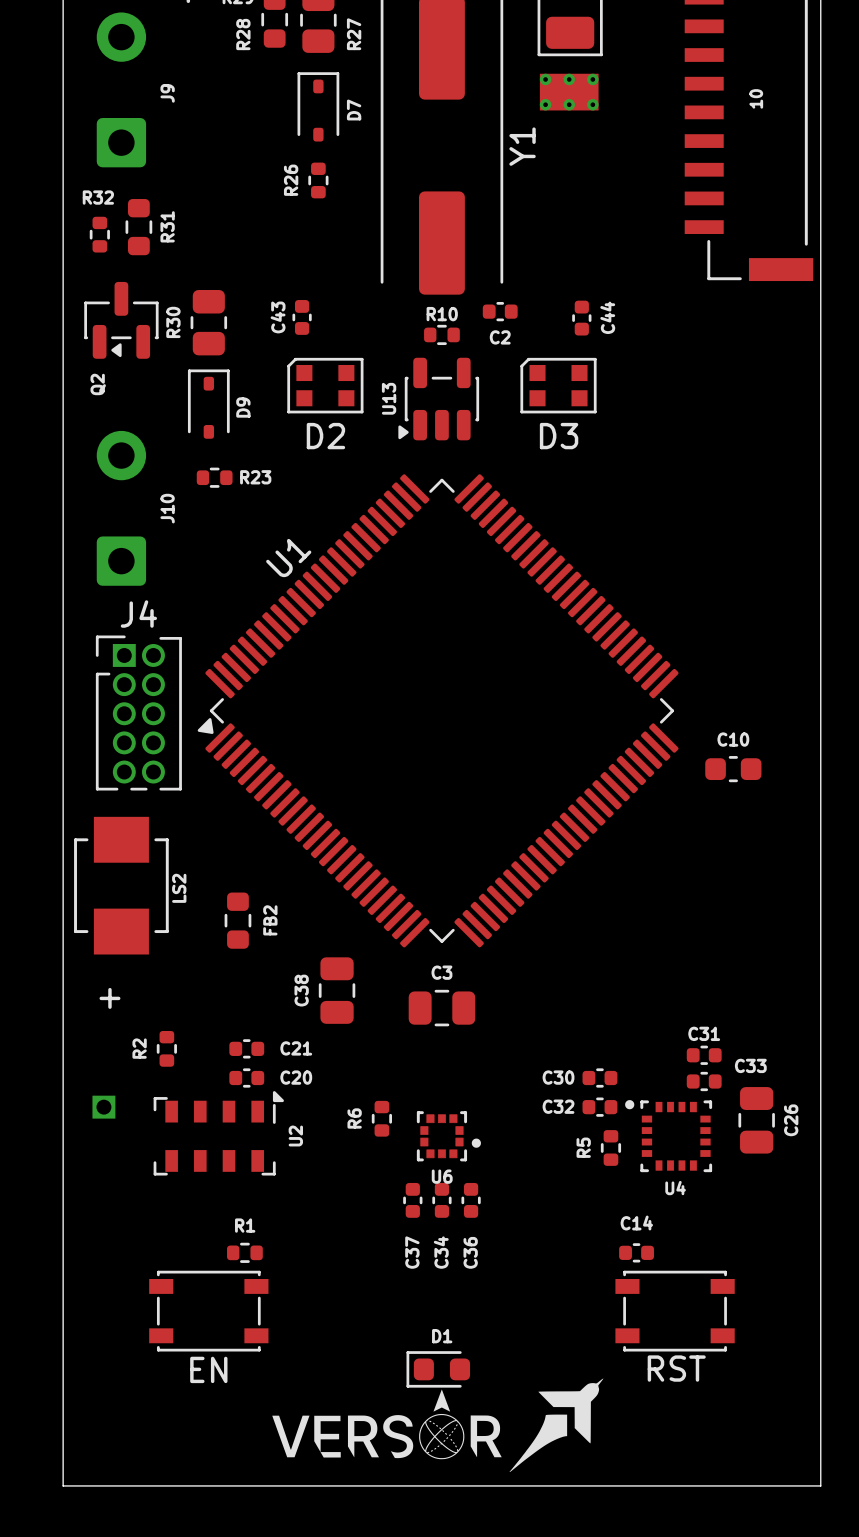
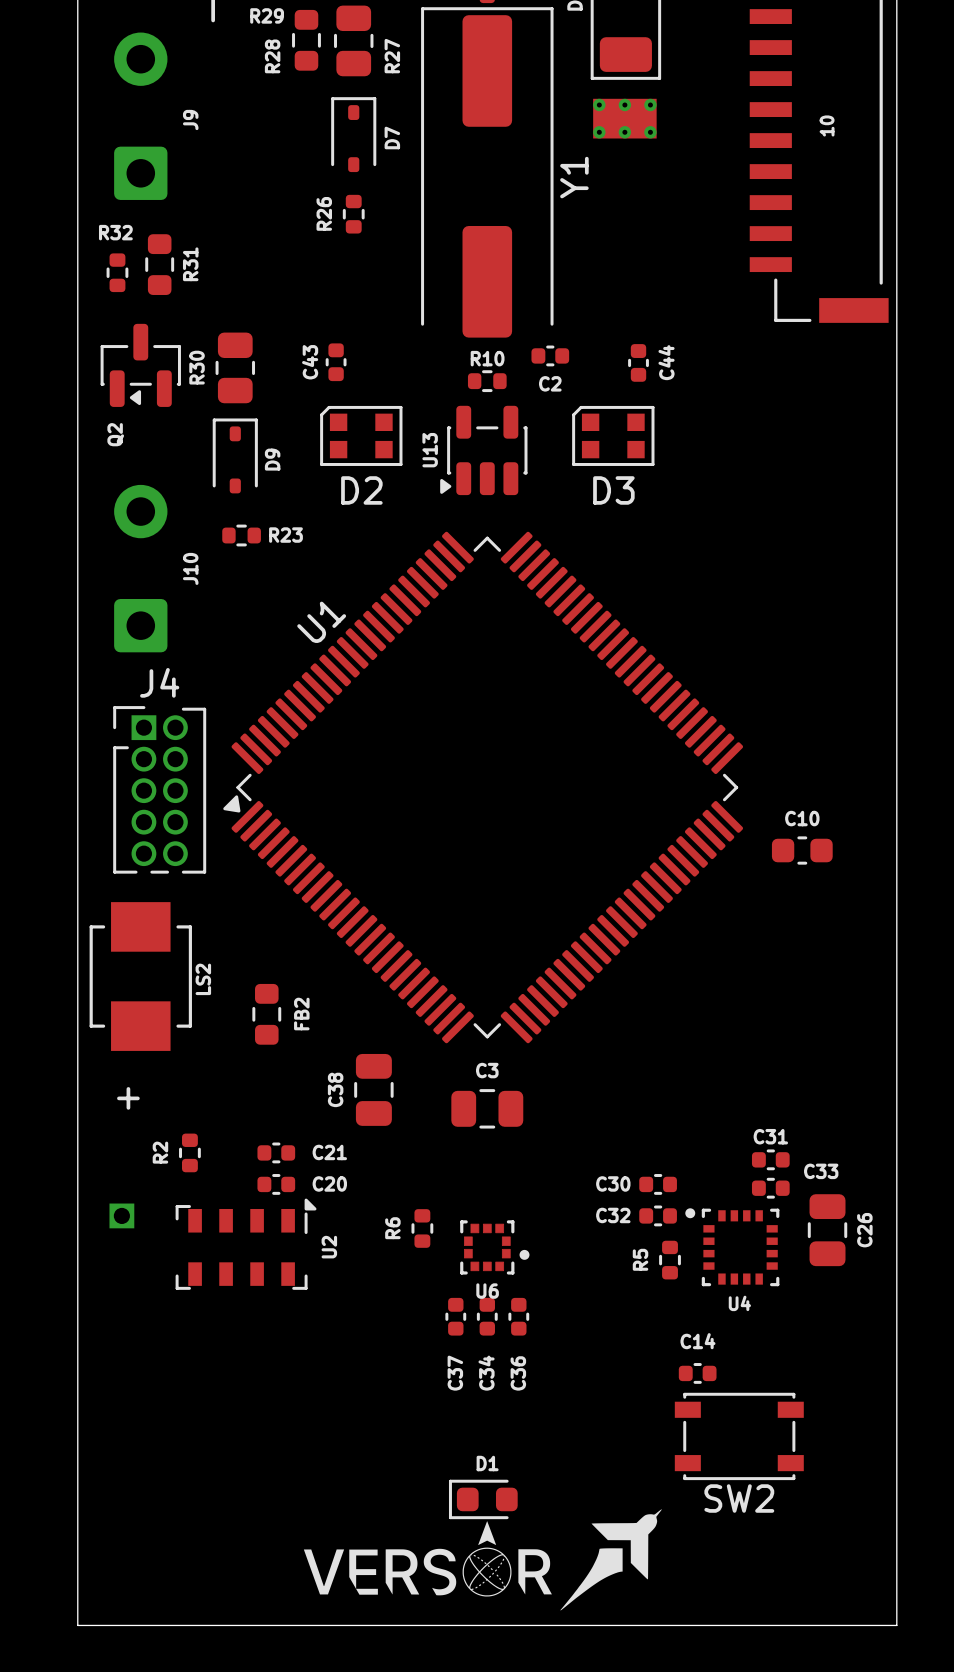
R1: (244, 1252) -> none
EN: (208, 1311) -> none
RST name: RST (676, 1368) -> SW2 (739, 1498)

